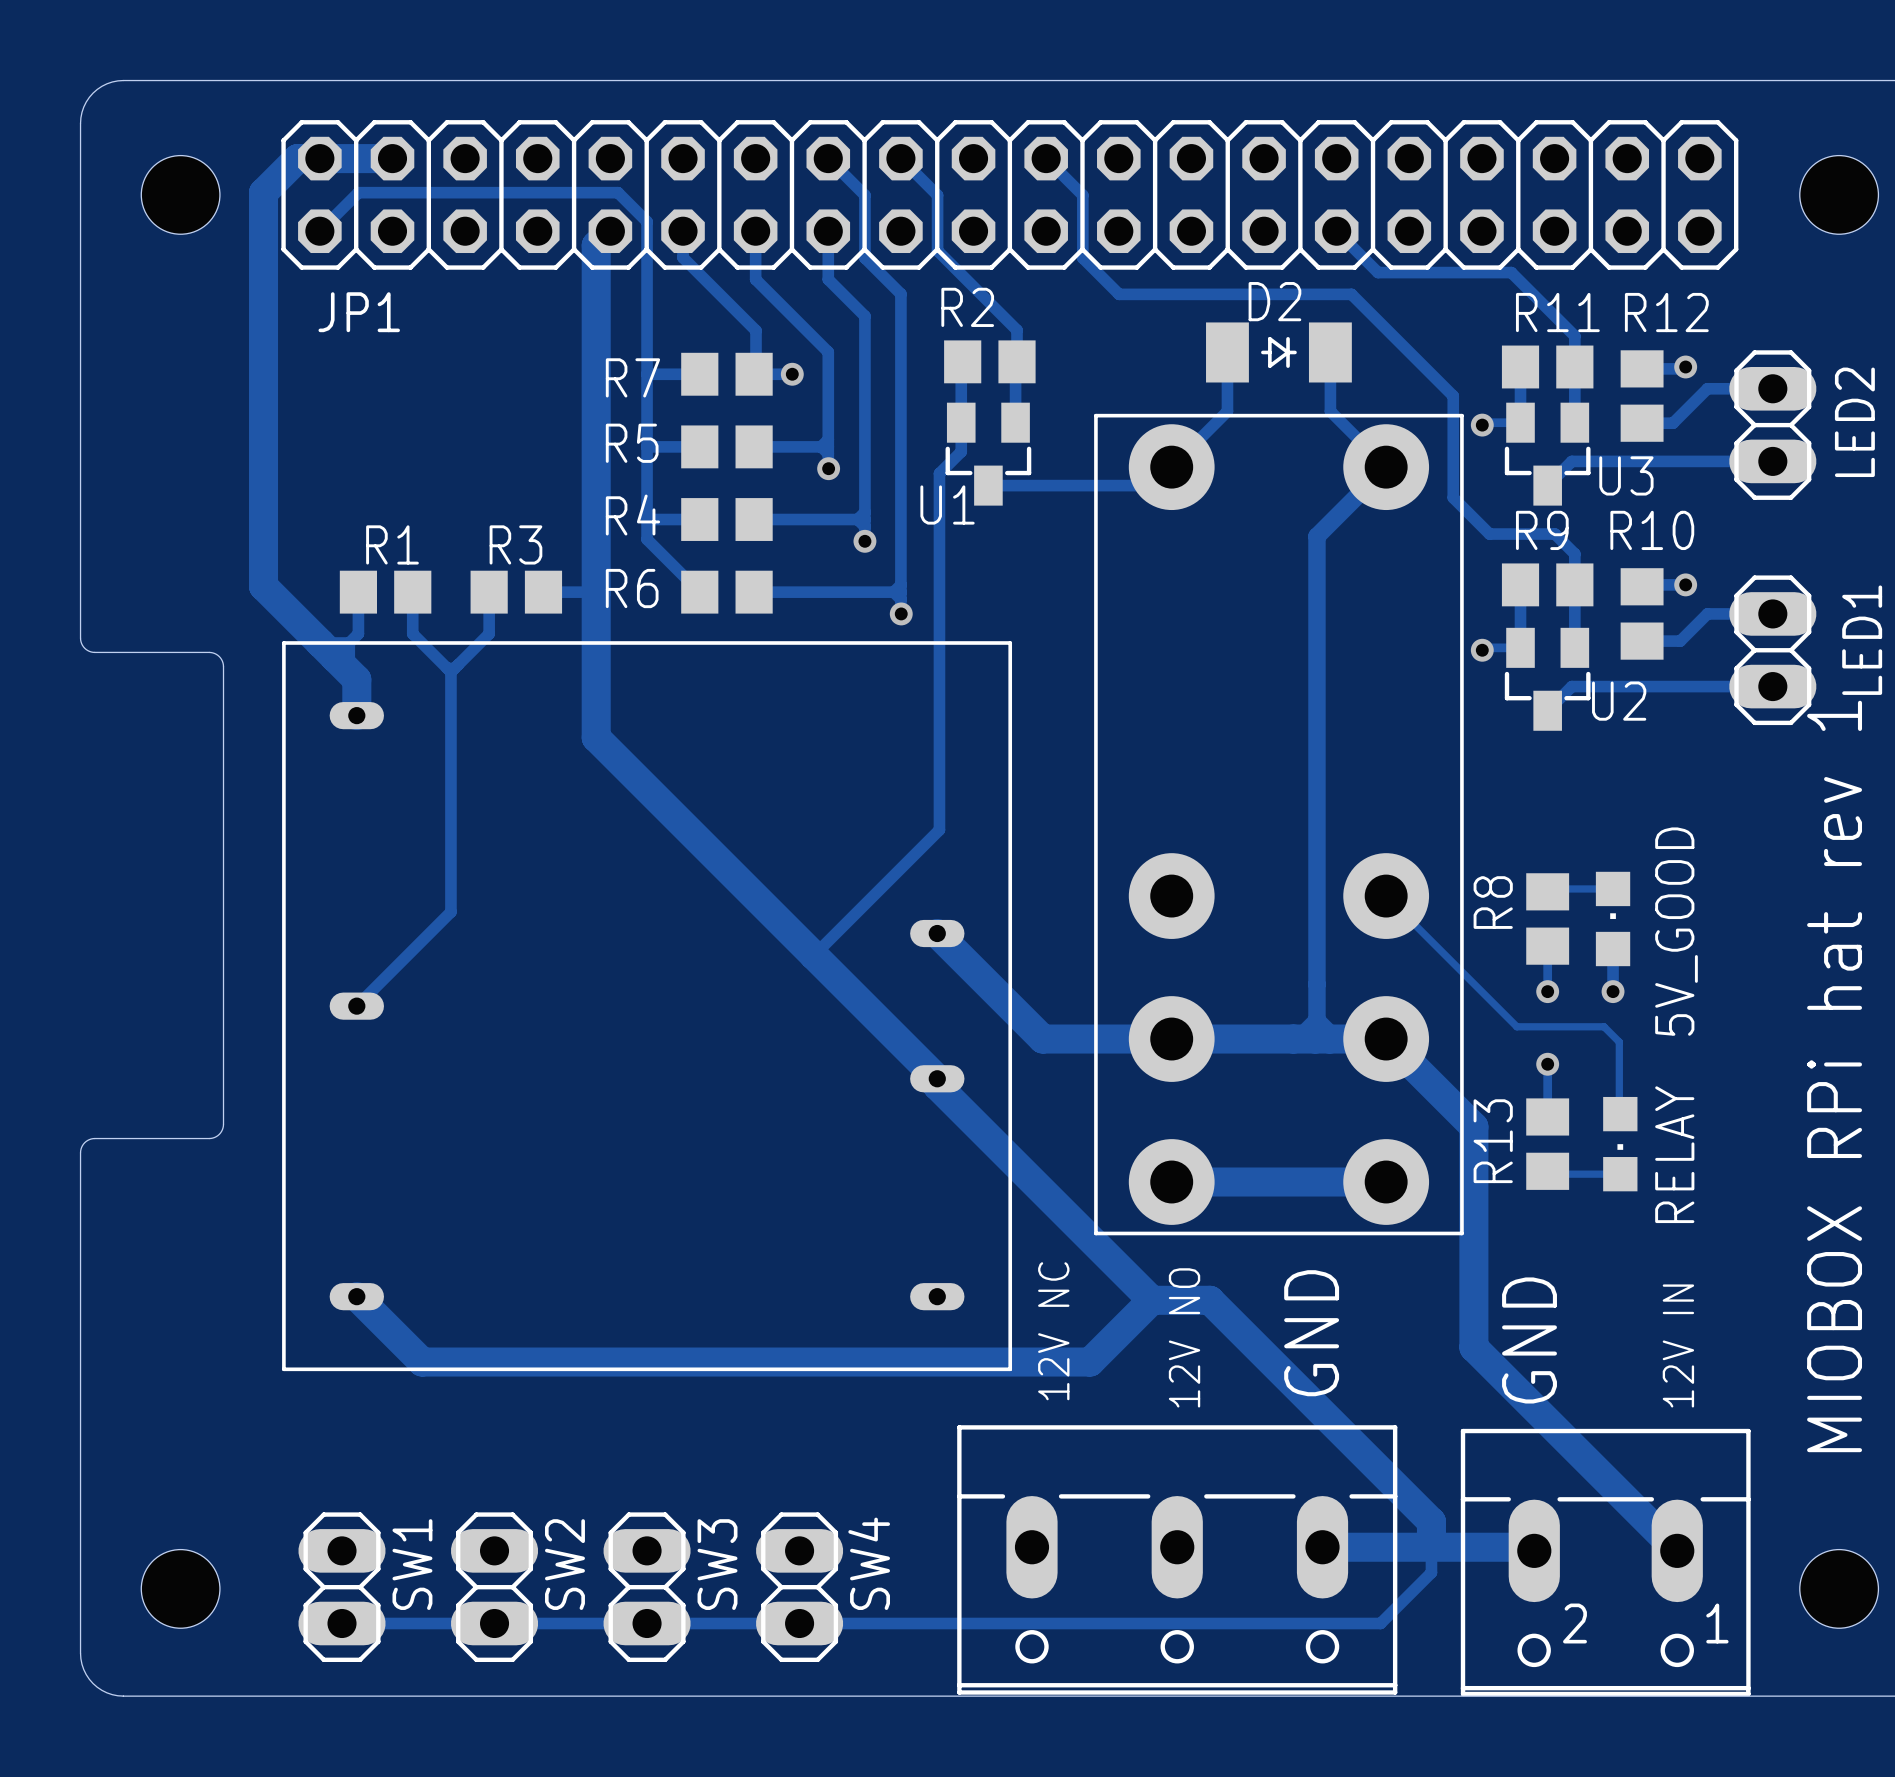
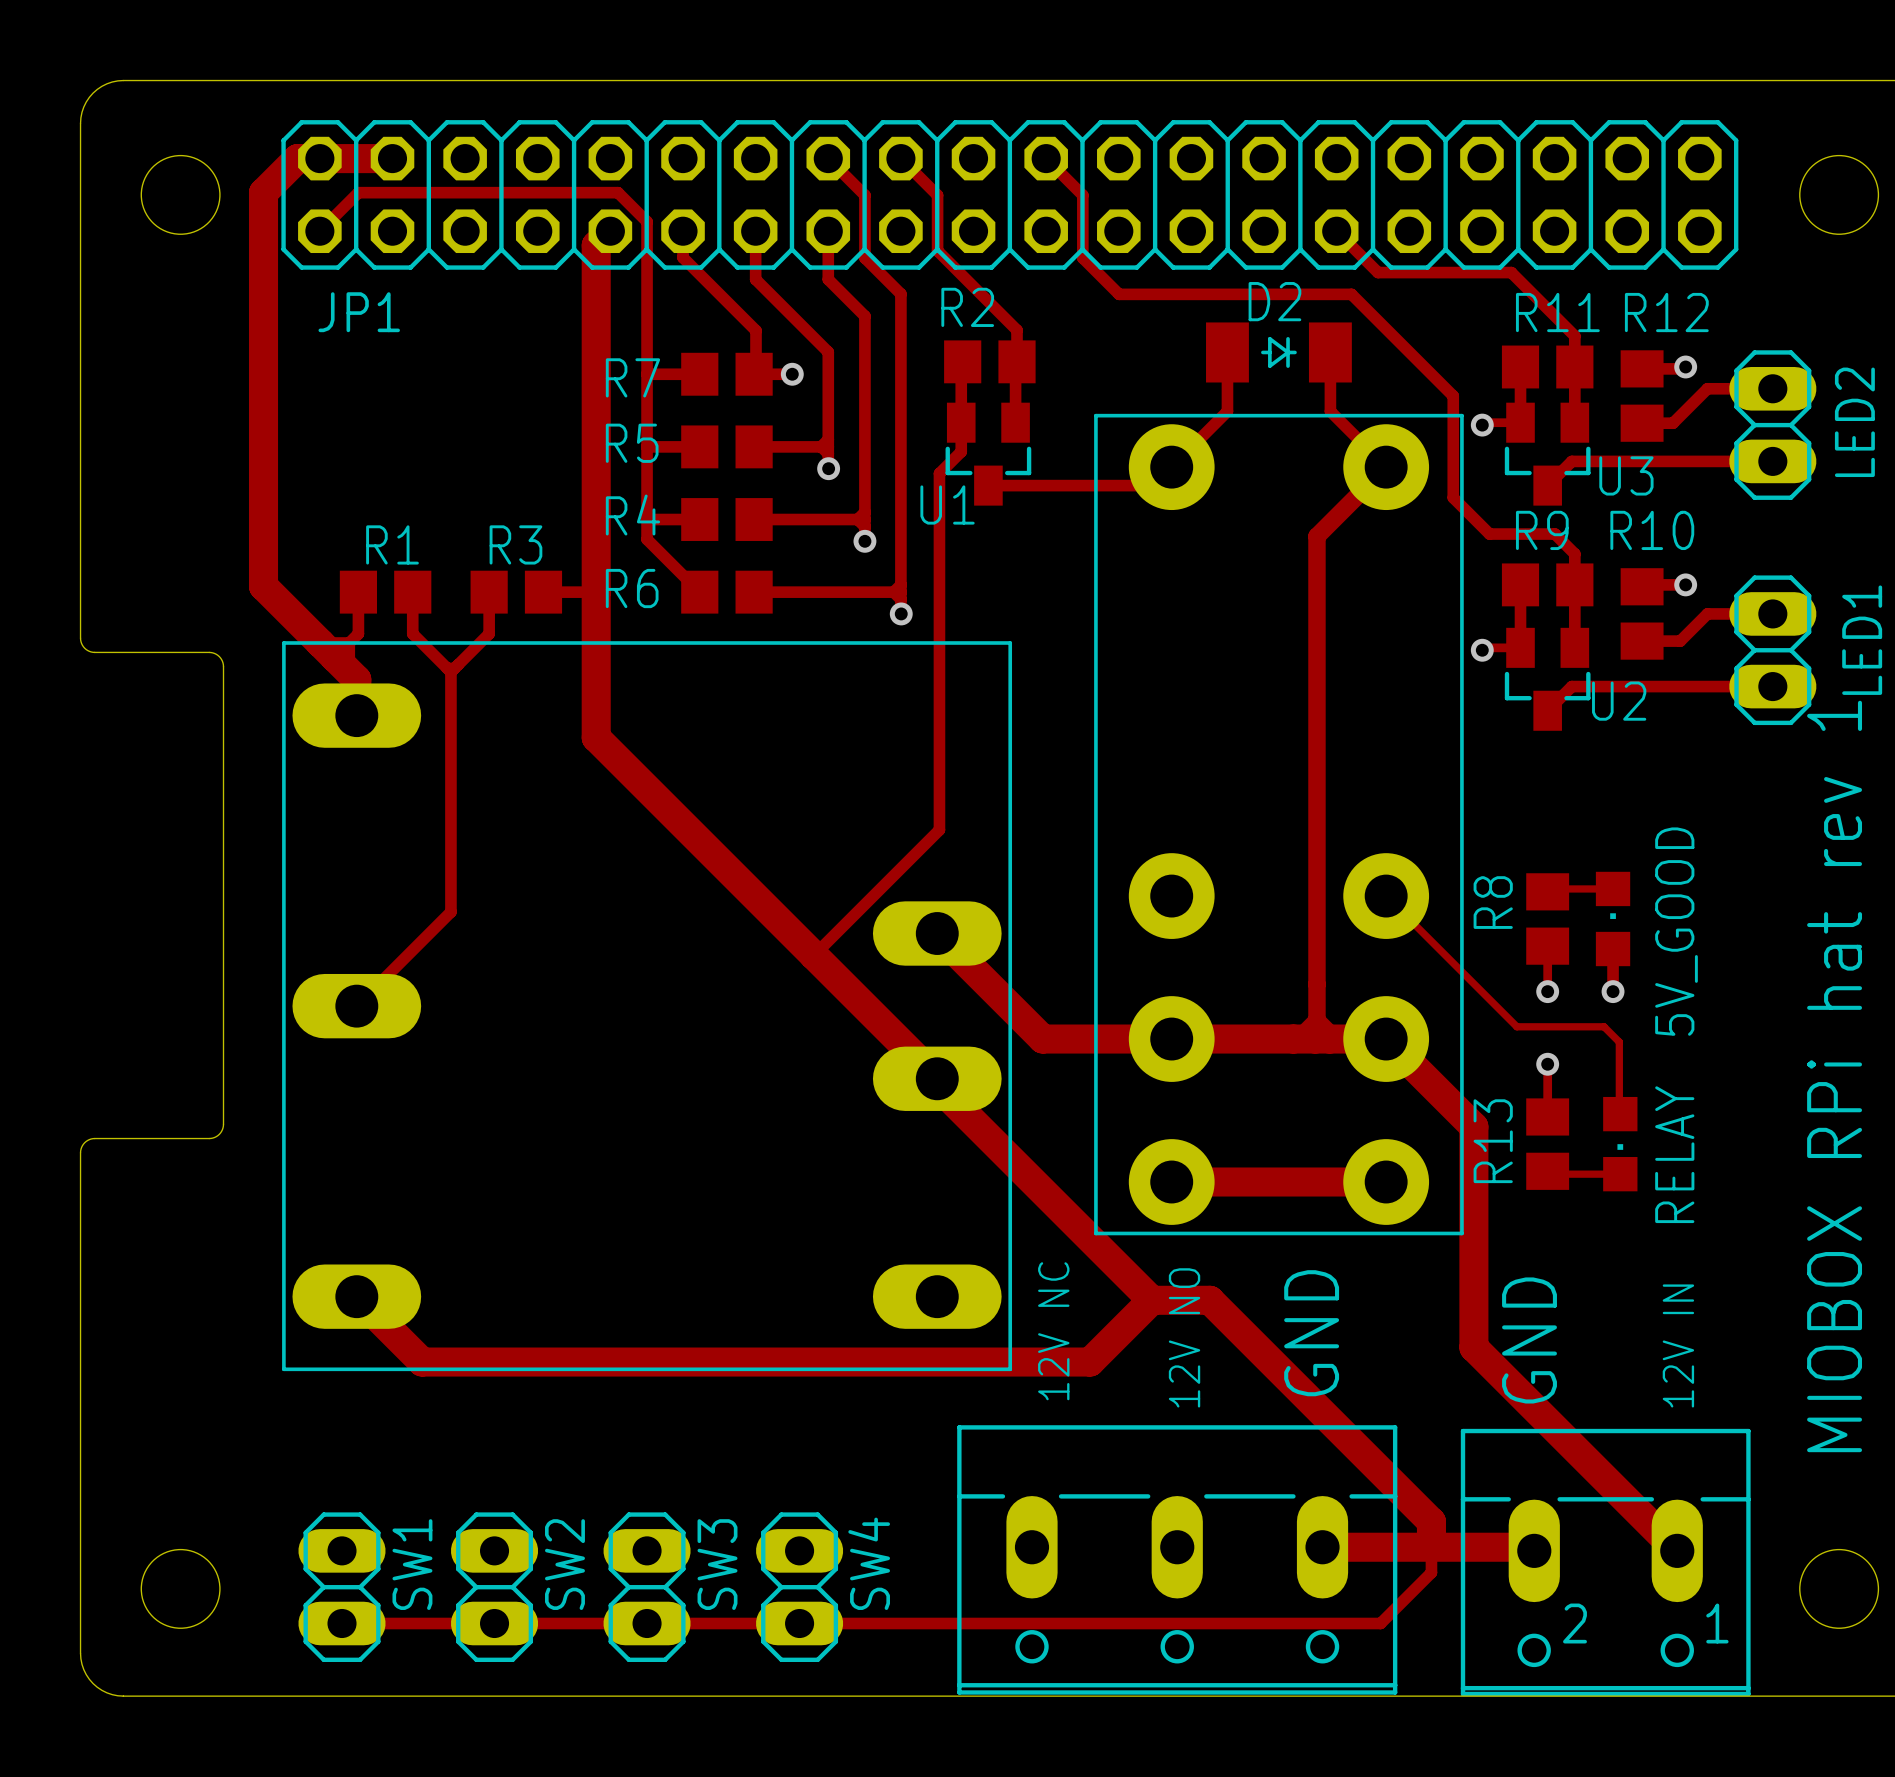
part footprint: [282, 641, 1013, 1372] -> [282, 641, 1013, 1372]

